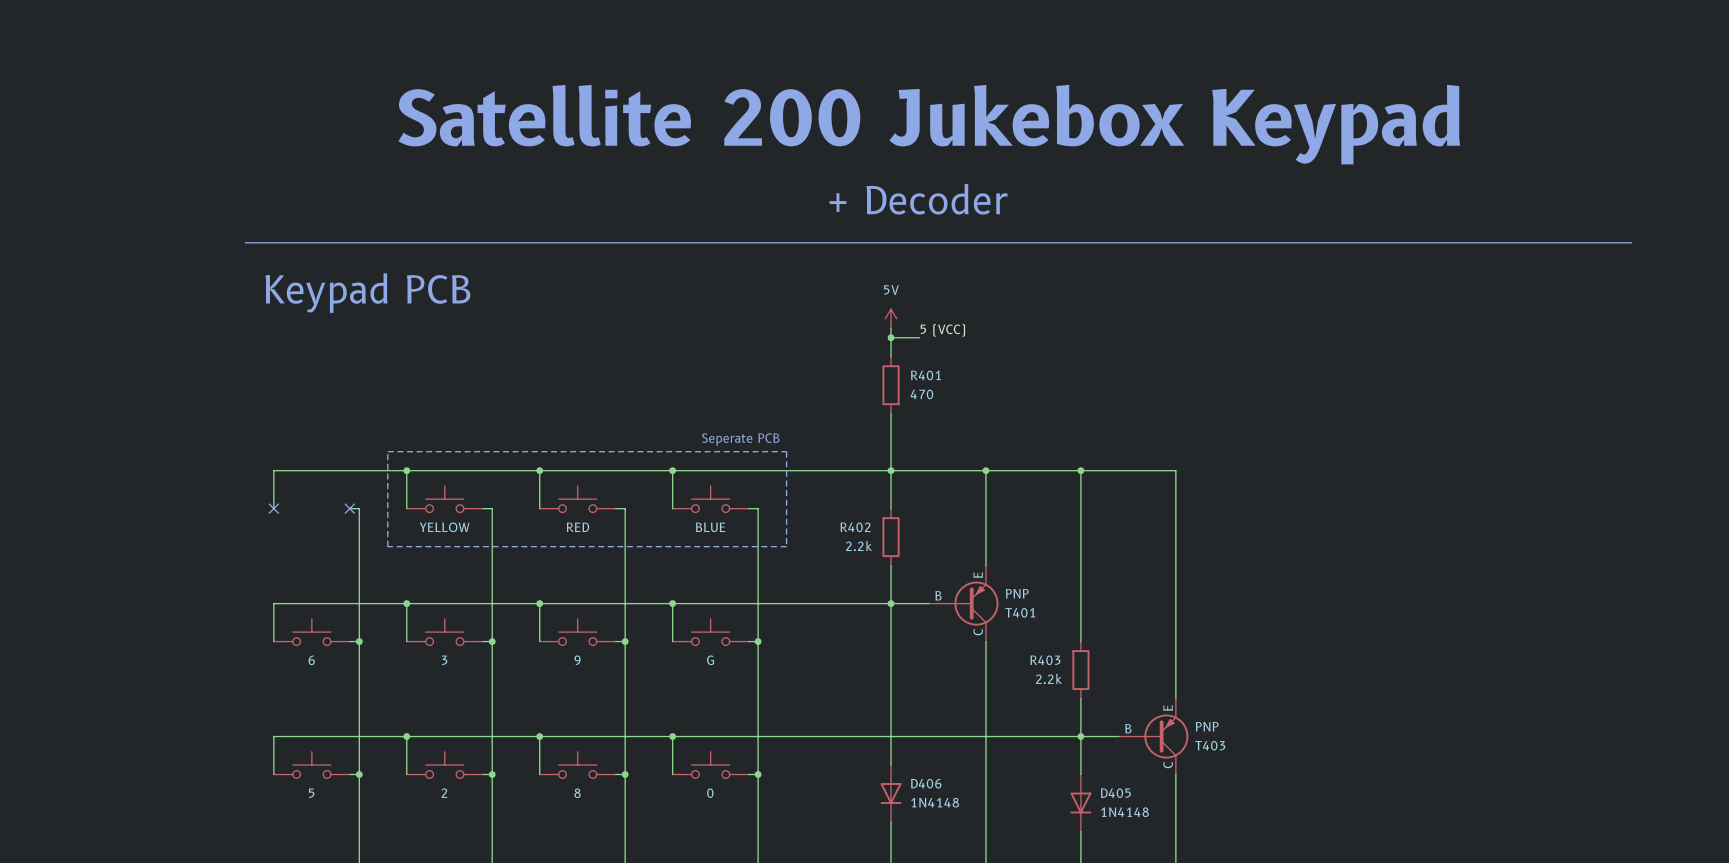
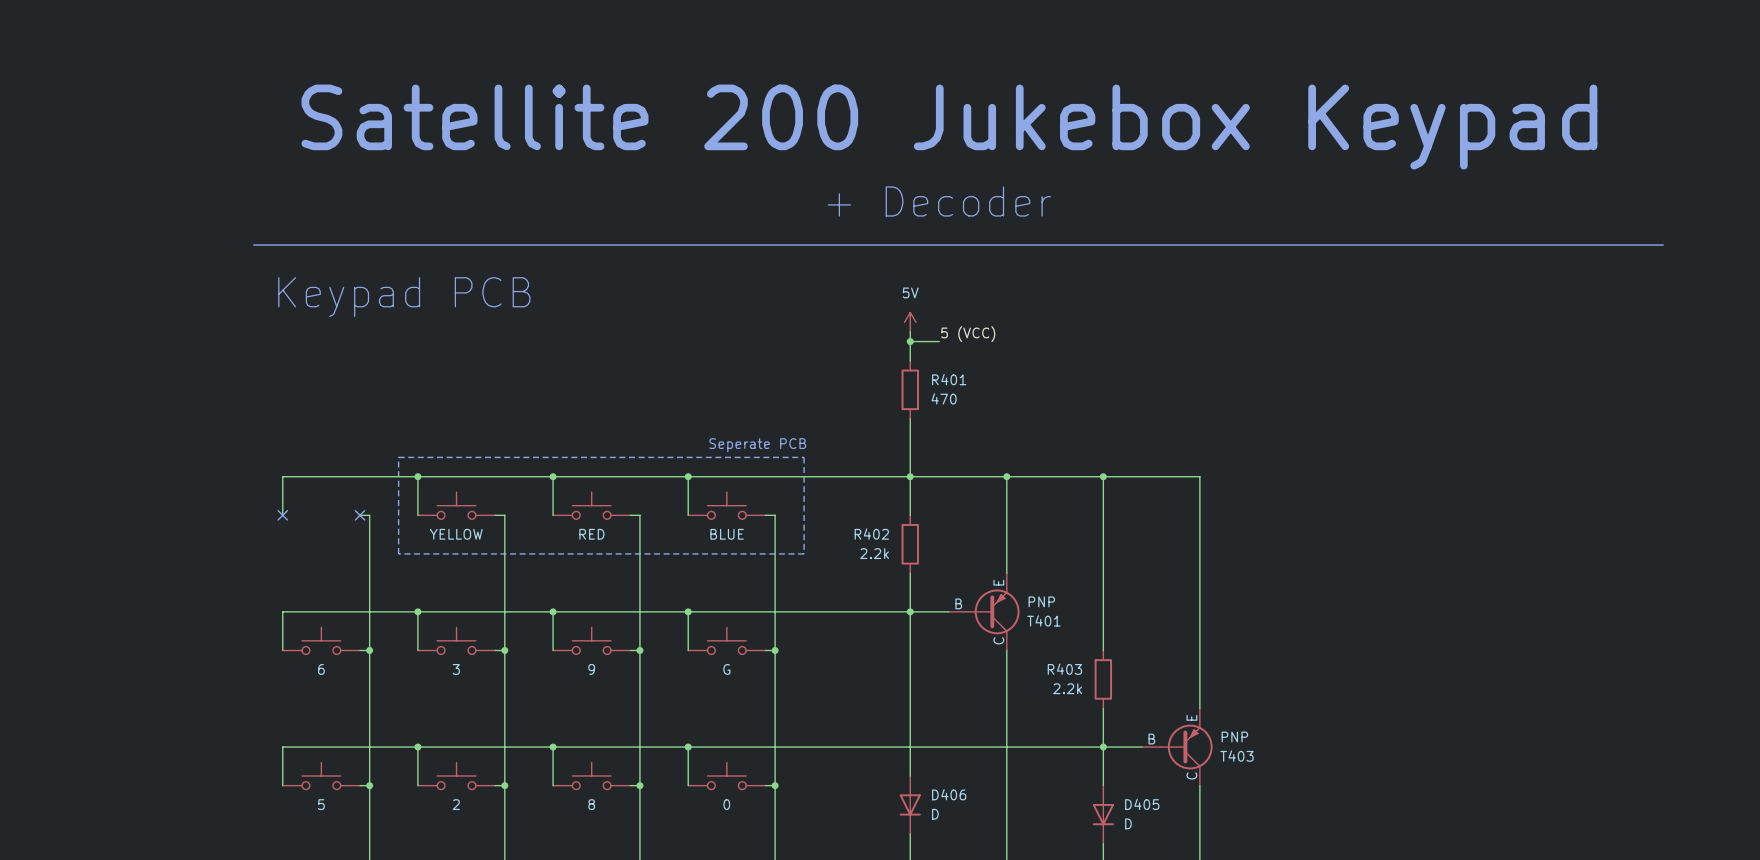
D406 value: 1N4148 (935, 802) -> D (935, 814)
D405 value: 1N4148 (1124, 812) -> D (1128, 823)

